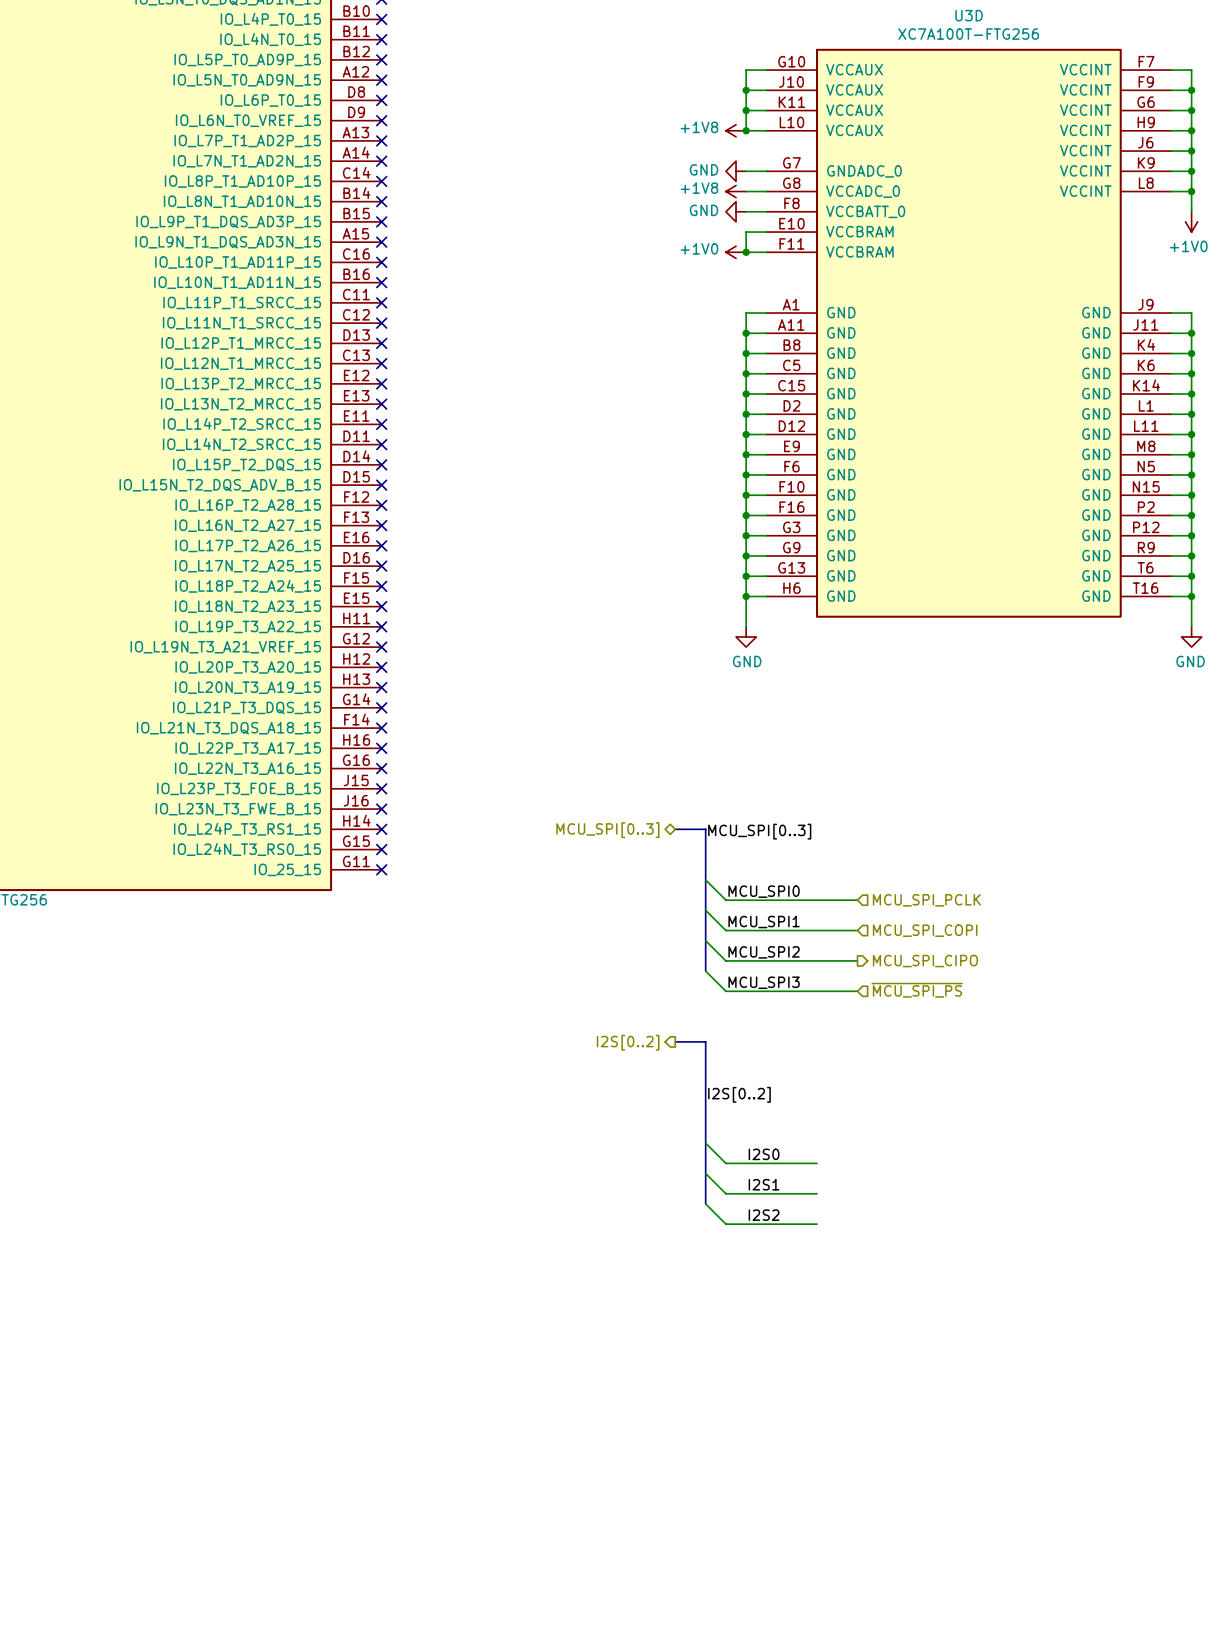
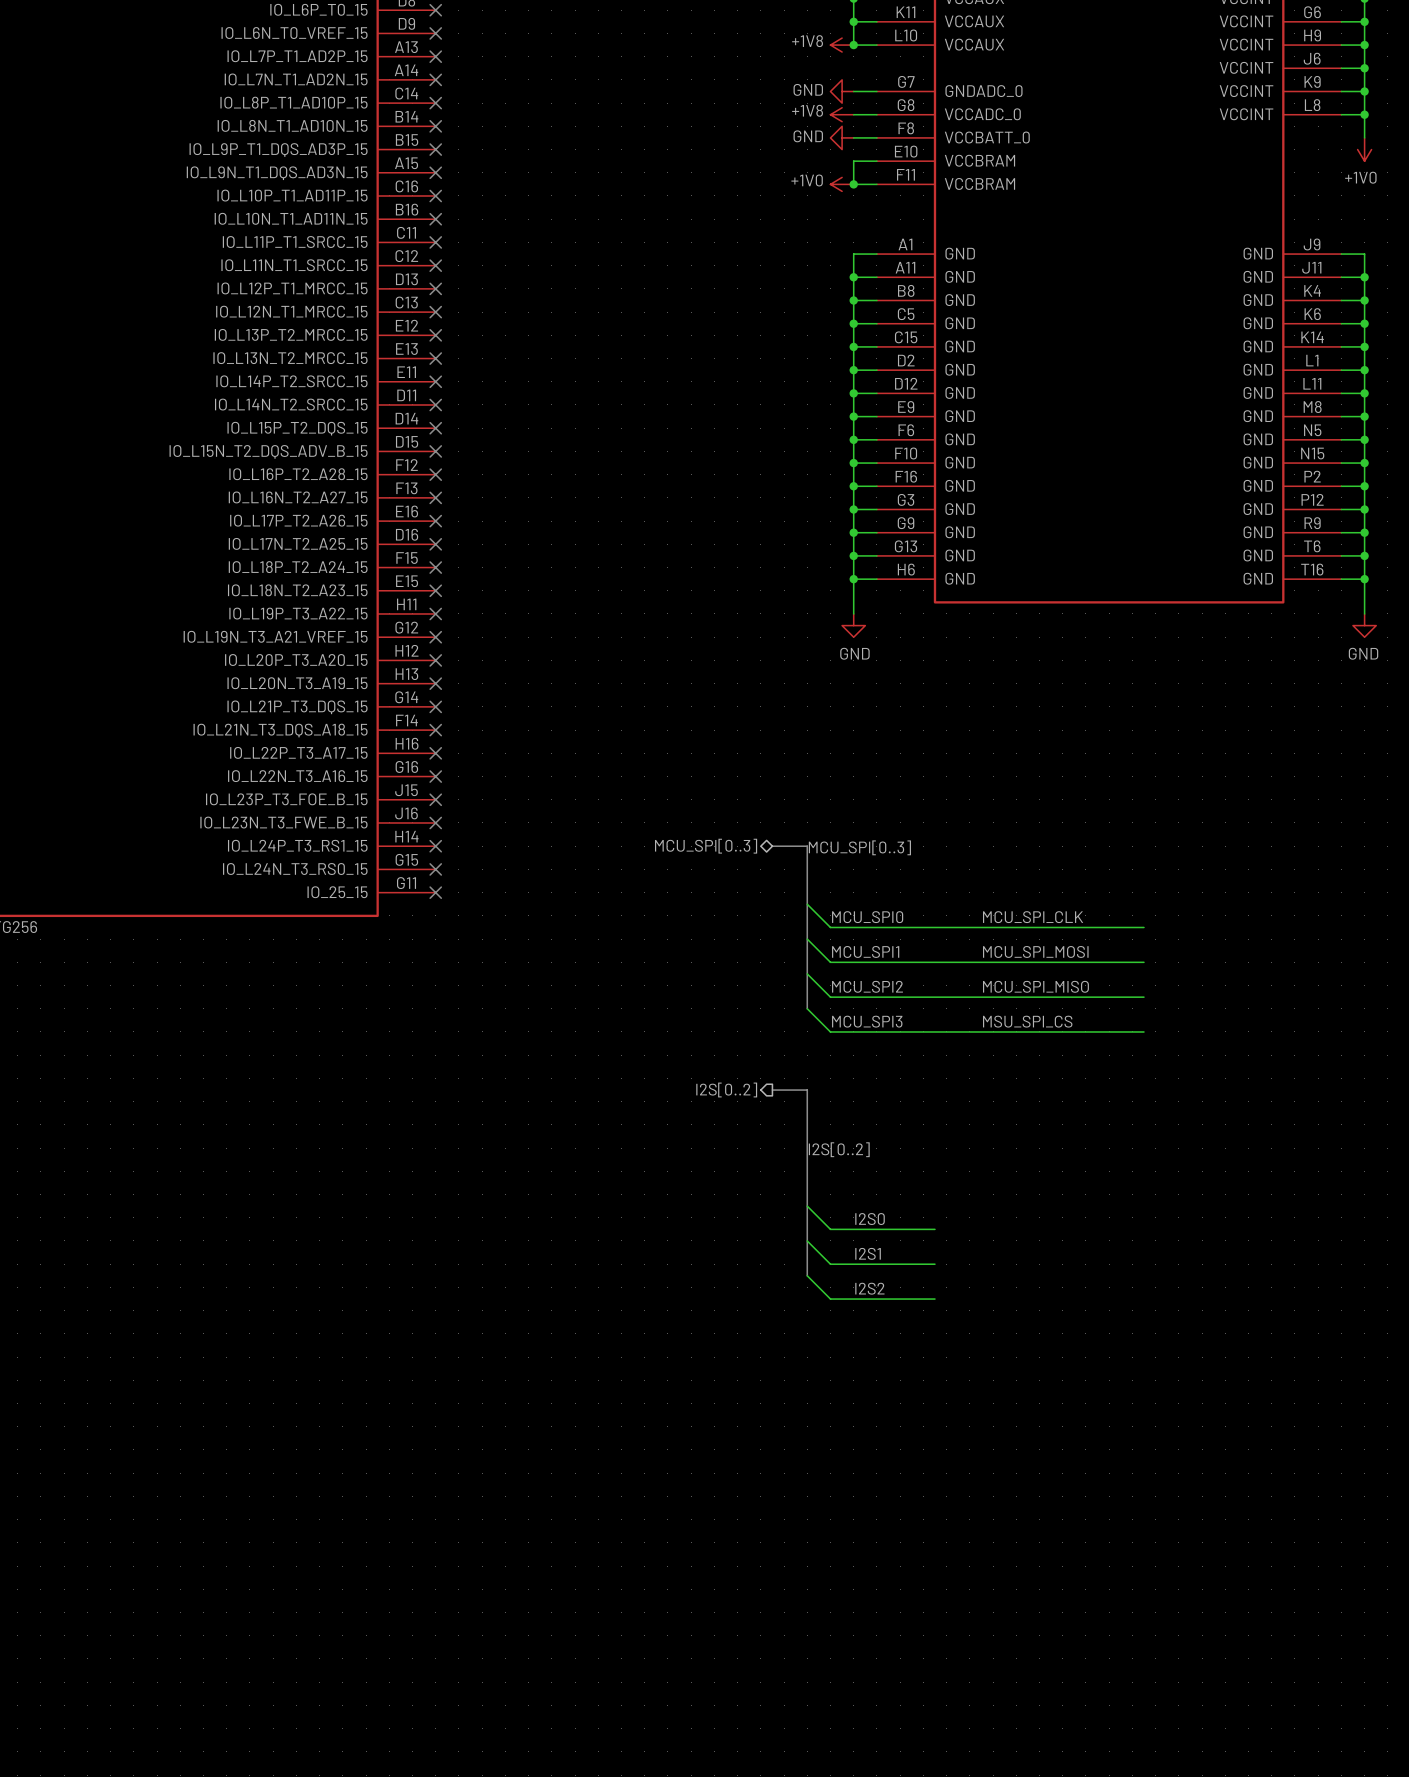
label: none -> MCU_SPI_CLK (1033, 917)
wire: none -> (981, 927) (1143, 927)
hierarchical label: MCU_SPI_PCLK (926, 900) -> none
label: none -> MCU_SPI_MOSI (1035, 951)
wire: none -> (981, 962) (1143, 962)
hierarchical label: MCU_SPI_COPI (925, 930) -> none
label: none -> MCU_SPI_MISO (1035, 986)
wire: none -> (981, 997) (1143, 997)
hierarchical label: MCU_SPI_CIPO (925, 961) -> none
label: none -> MSU_SPI_CS (1027, 1021)
hierarchical label: ~{MCU_SPI_PS} (917, 990) -> none
wire: none -> (981, 1031) (1143, 1031)

